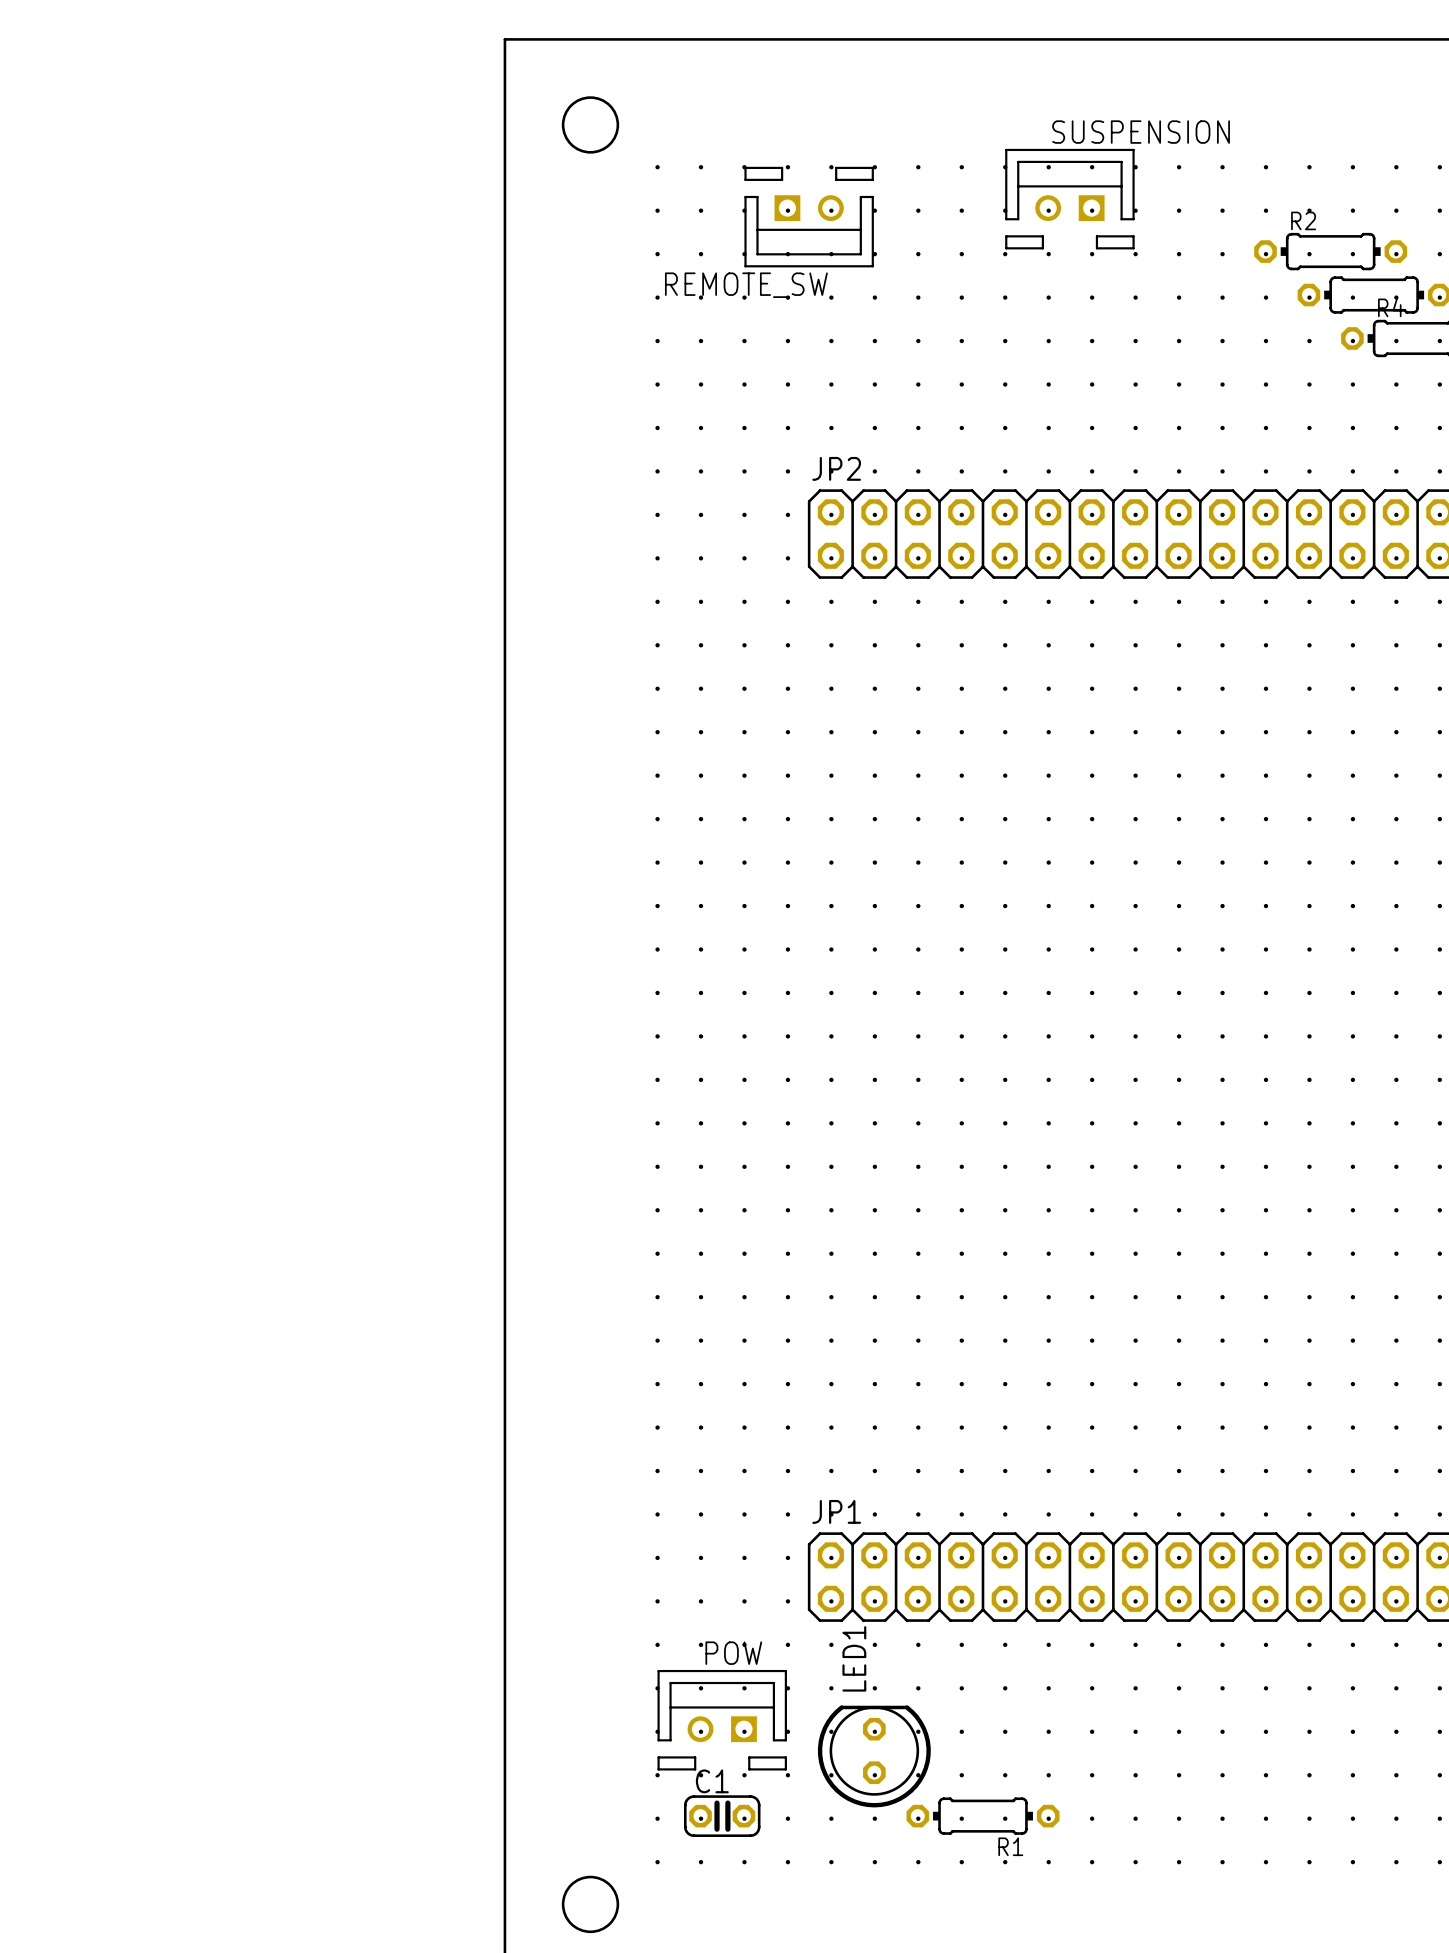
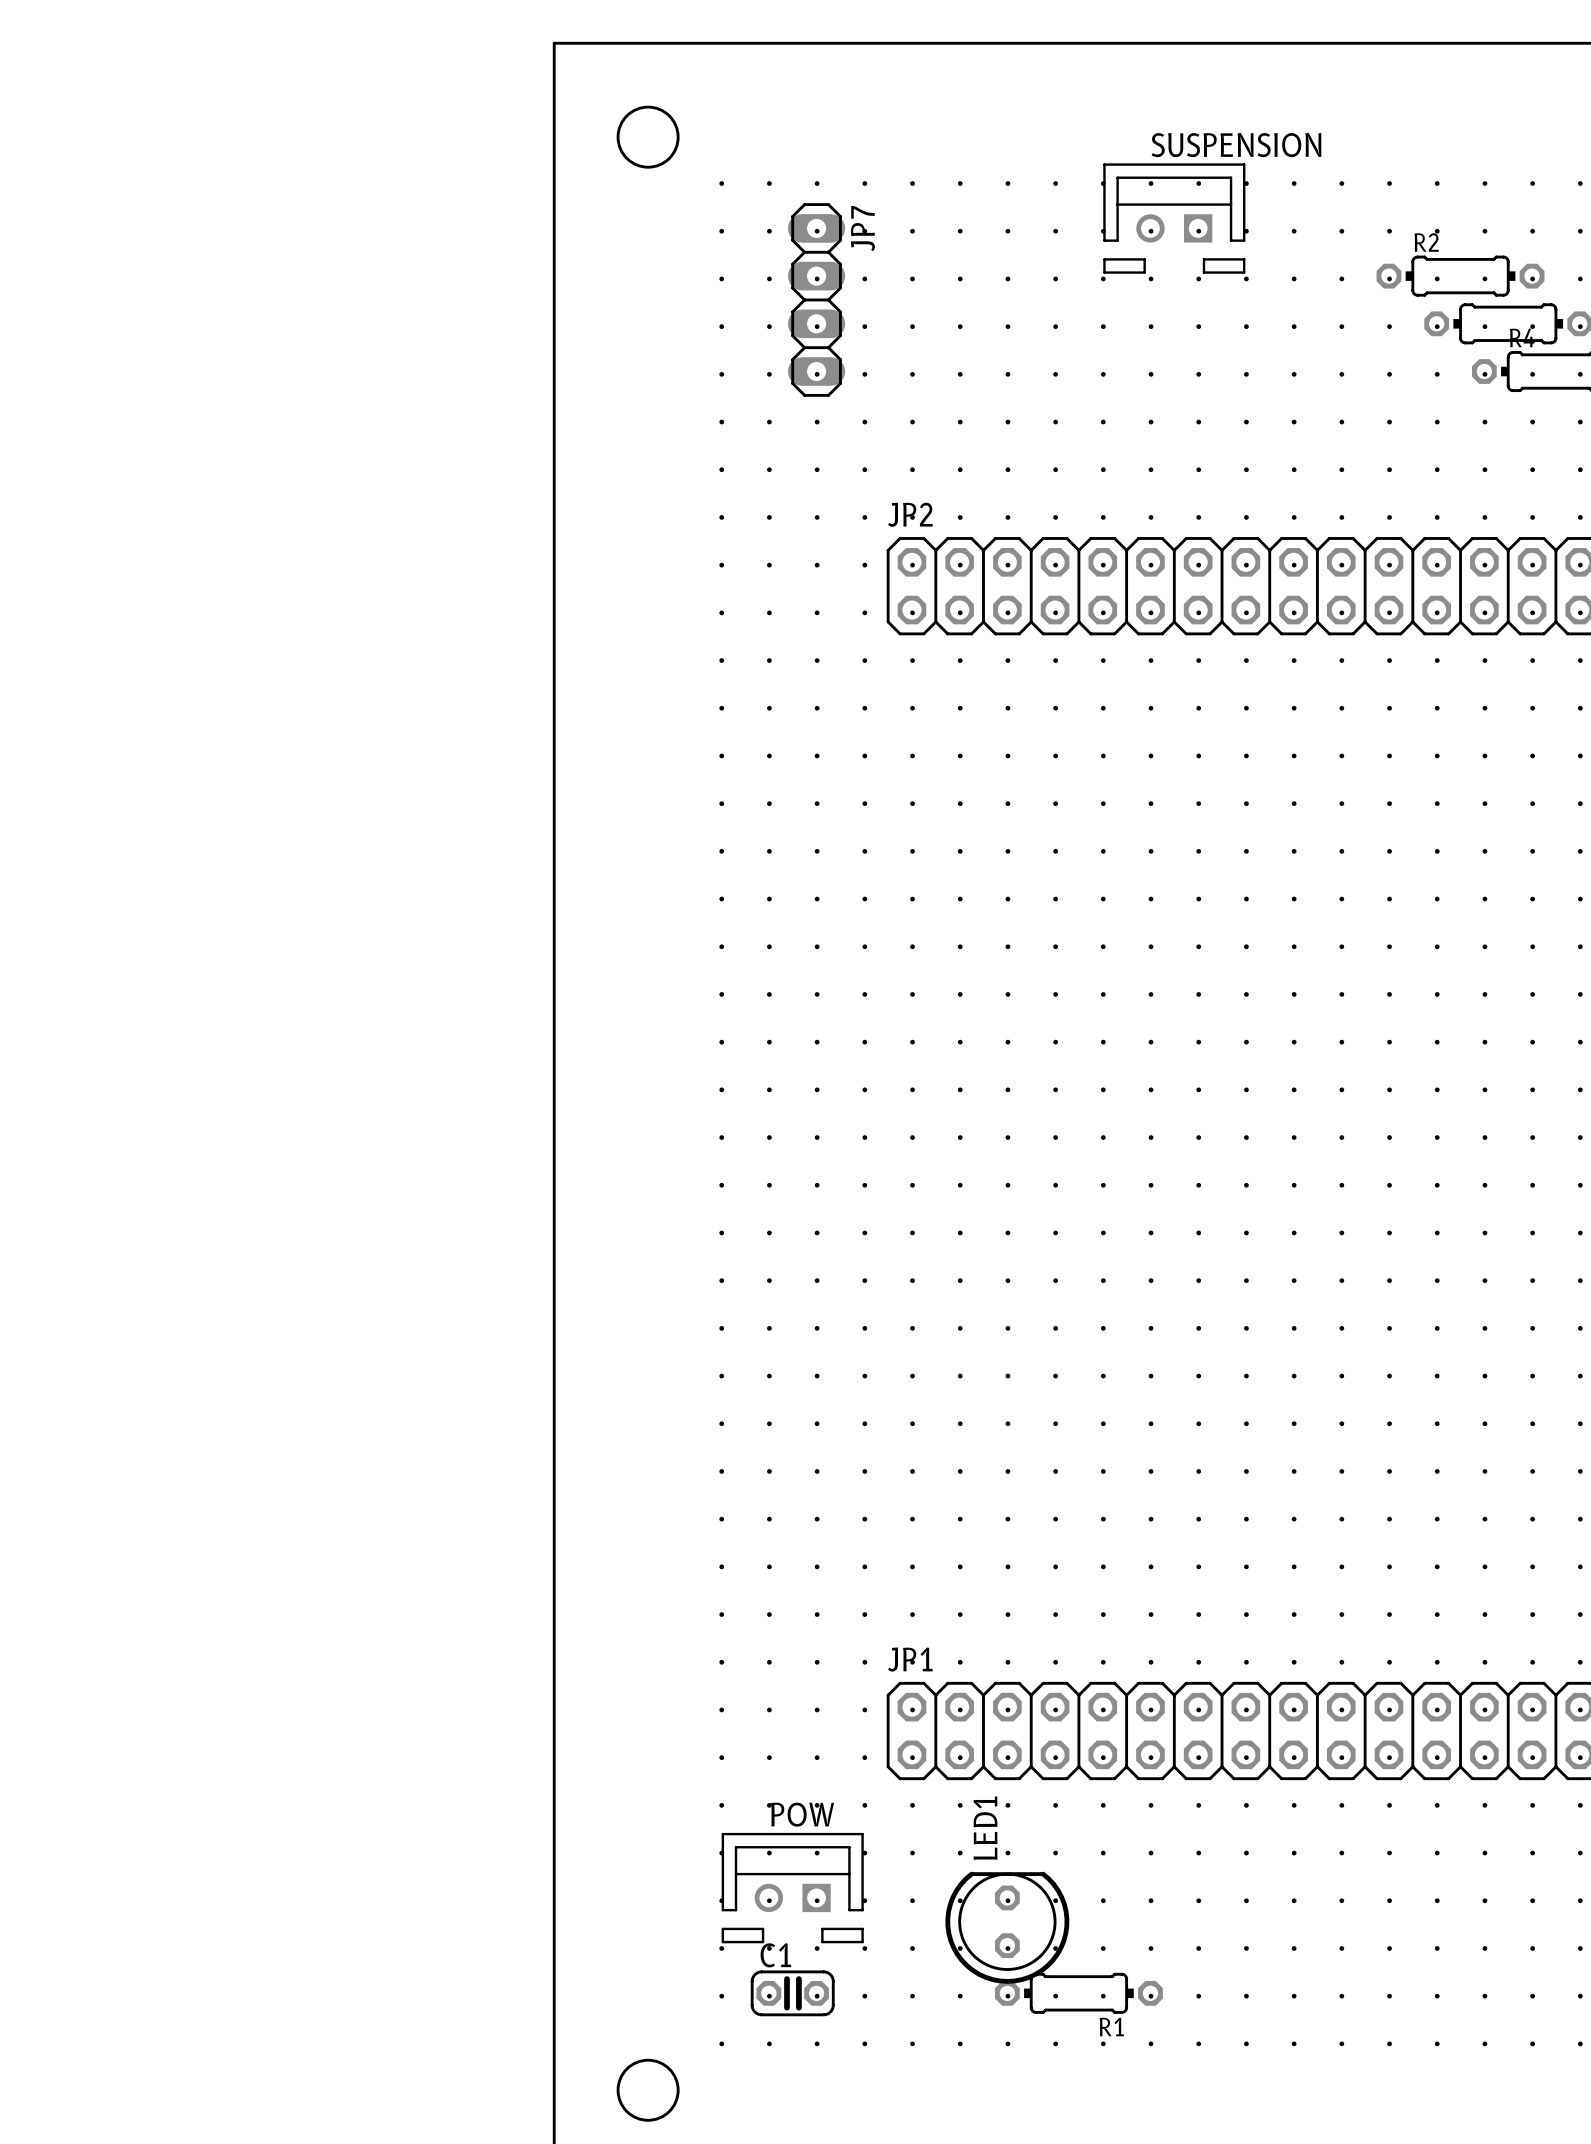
REMOTE_SW: (809, 217) -> none
JP7: none -> (816, 299)
LED1 position: (874, 1756) -> (1007, 1927)

